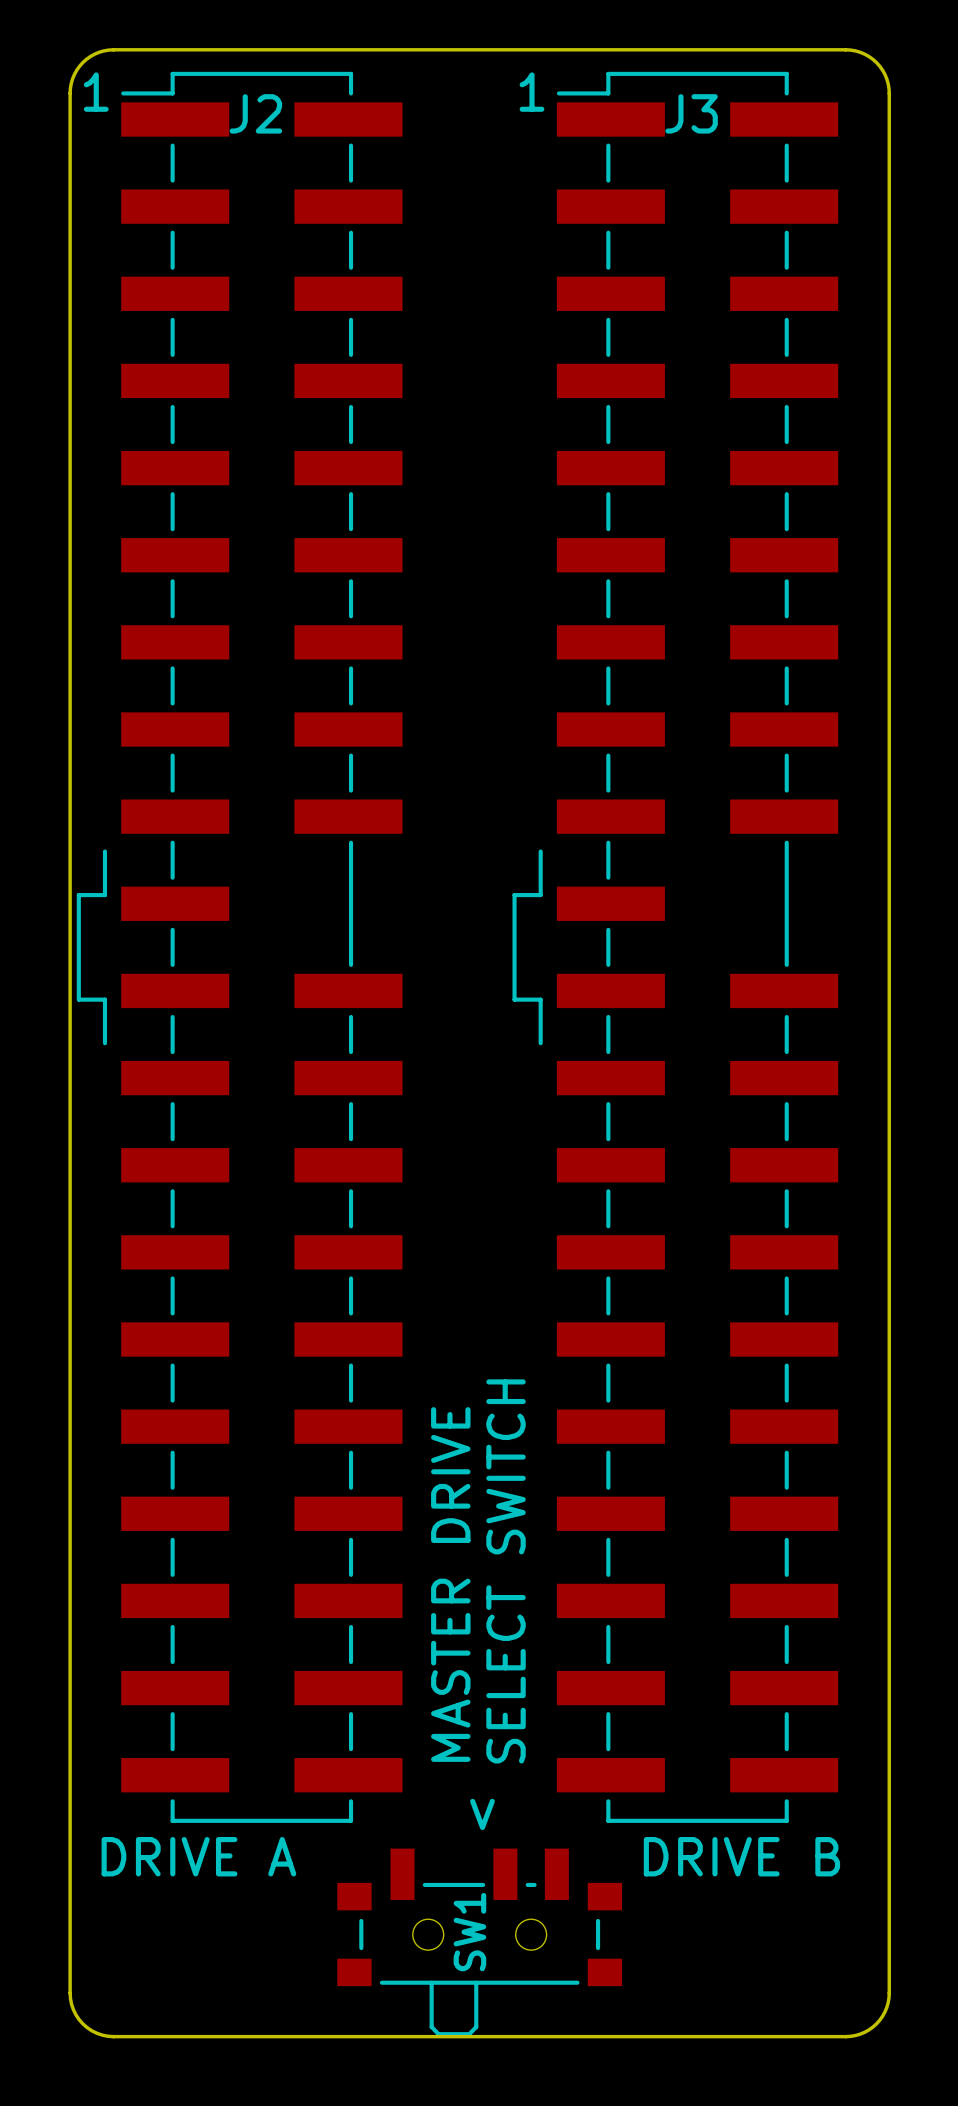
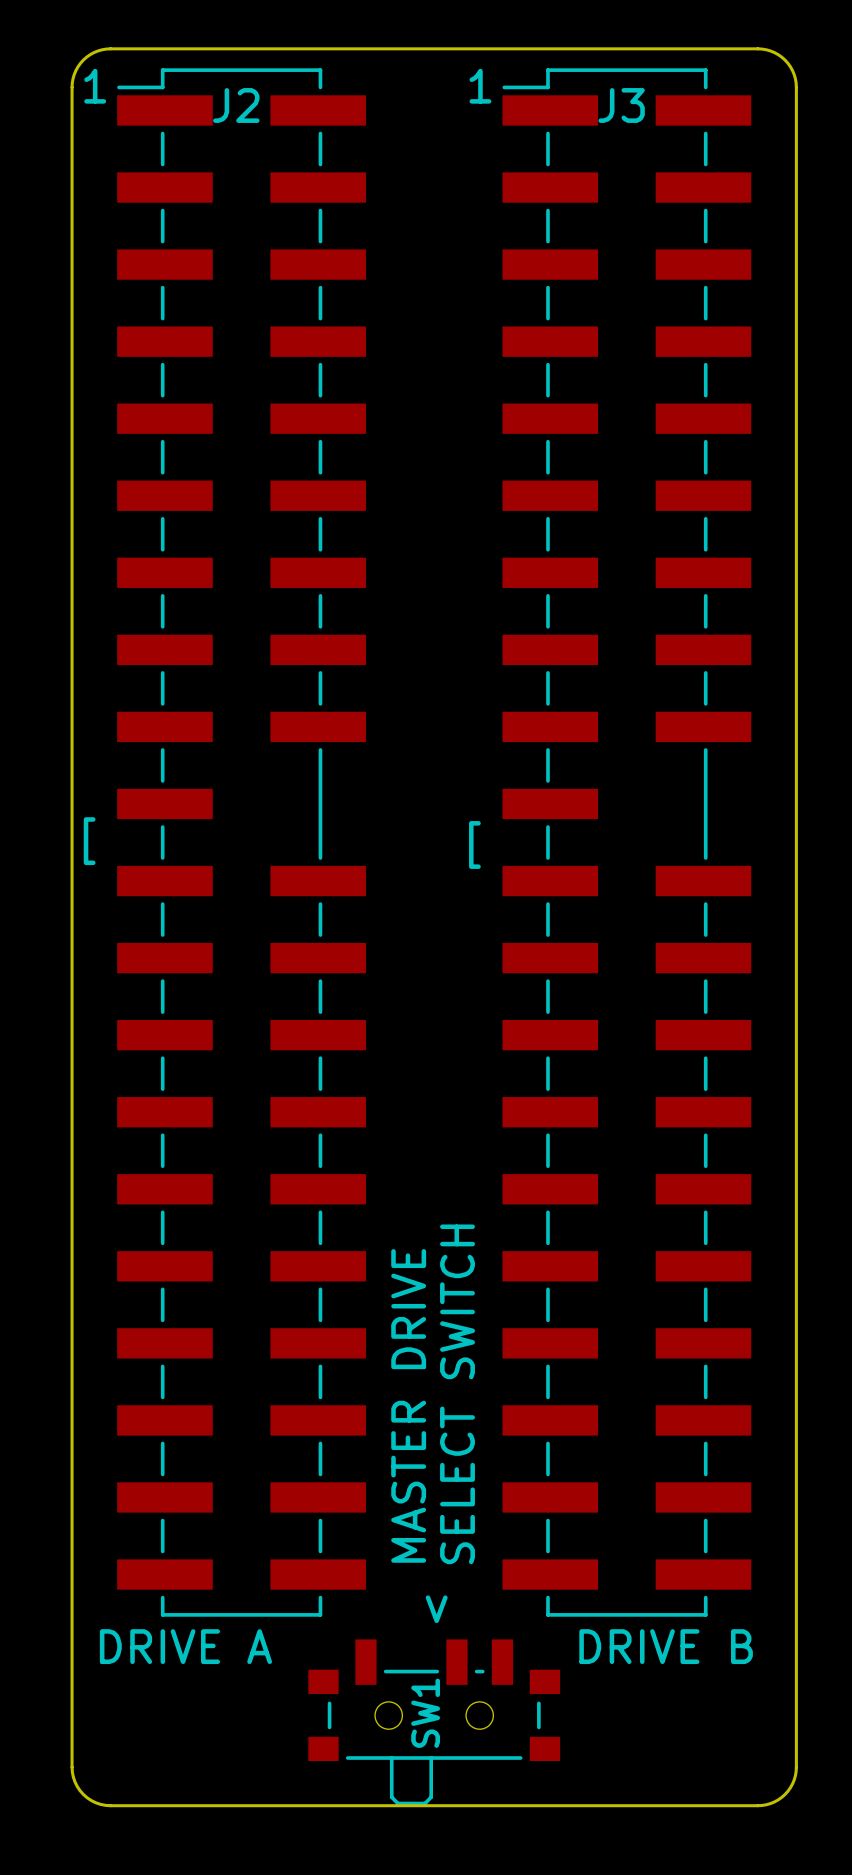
J2 footprint: [76, 71, 403, 1823] -> [117, 68, 366, 1617]
J3 footprint: [512, 71, 839, 1823] -> [502, 68, 752, 1617]
text: none -> [ (89, 841)
text: none -> [ (474, 844)

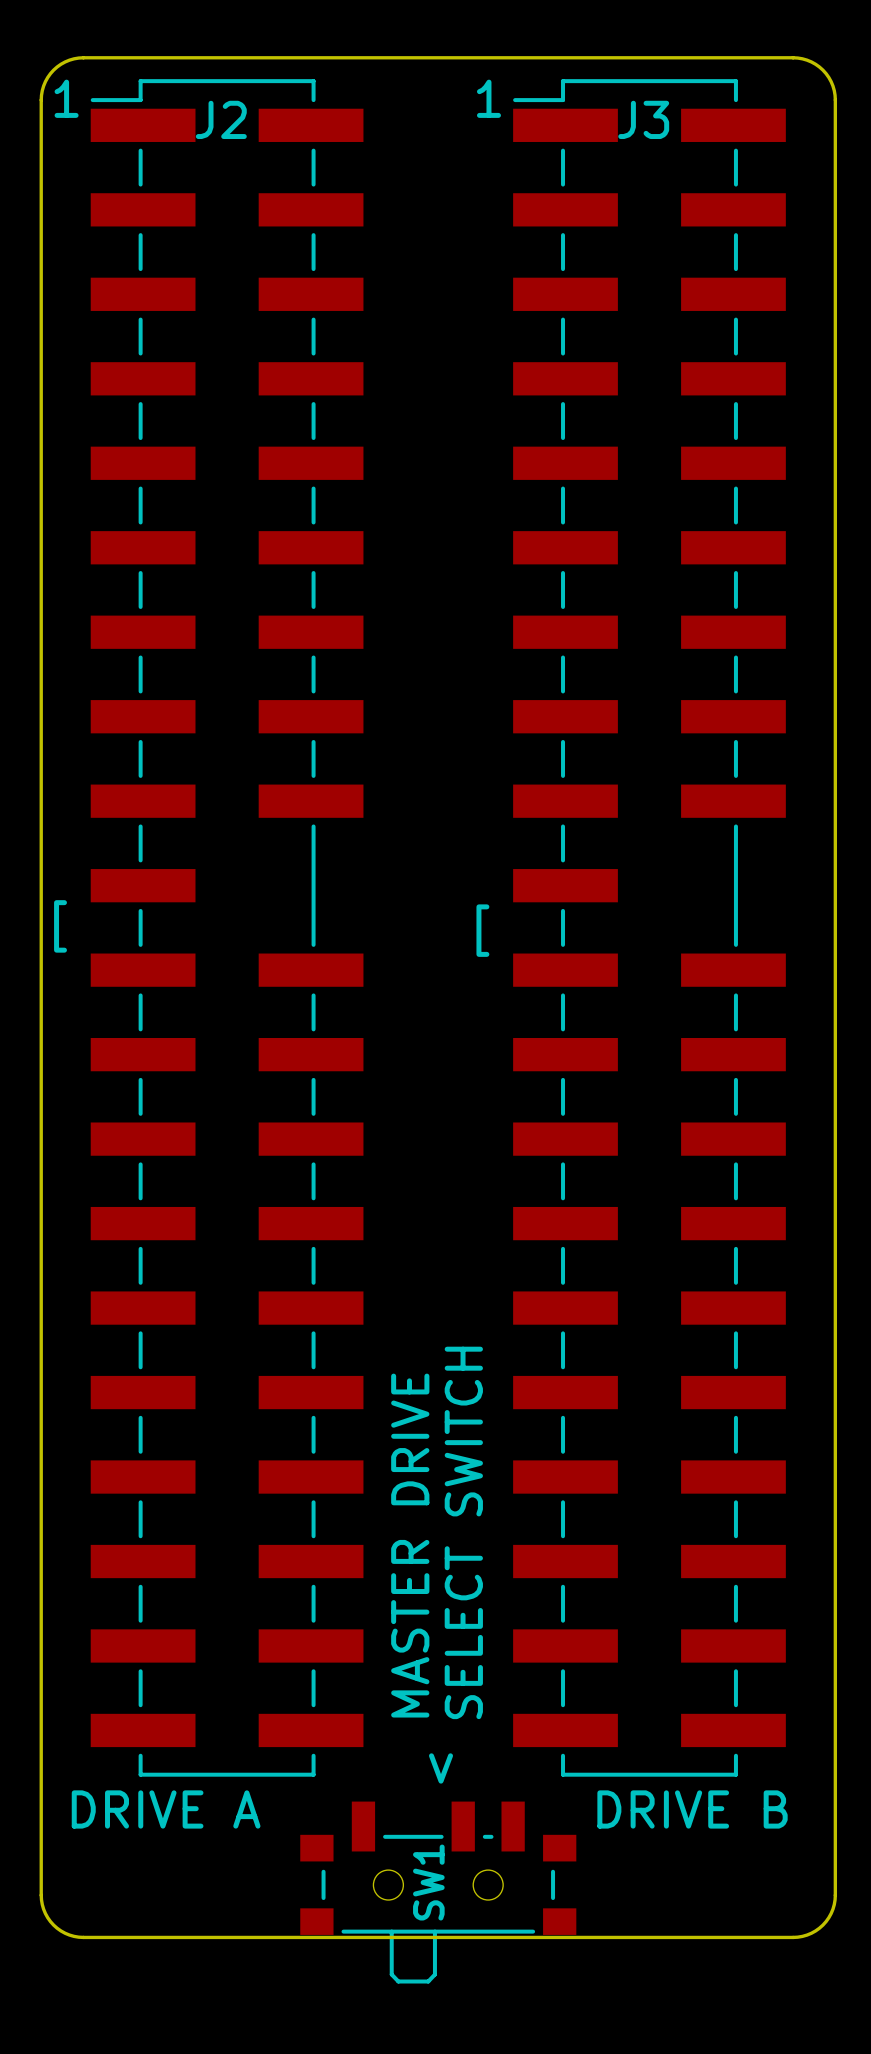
board edge: (72, 1724) (72, 1767) (74, 1781) (87, 1797) (100, 1804) (110, 1805) (762, 1805) (781, 1797) (792, 1783) (796, 1771) (796, 1724) -> (41, 1895) (43, 1909) (53, 1925) (69, 1935) (83, 1937) (797, 1937) (815, 1930) (826, 1921) (832, 1909) (835, 1895)

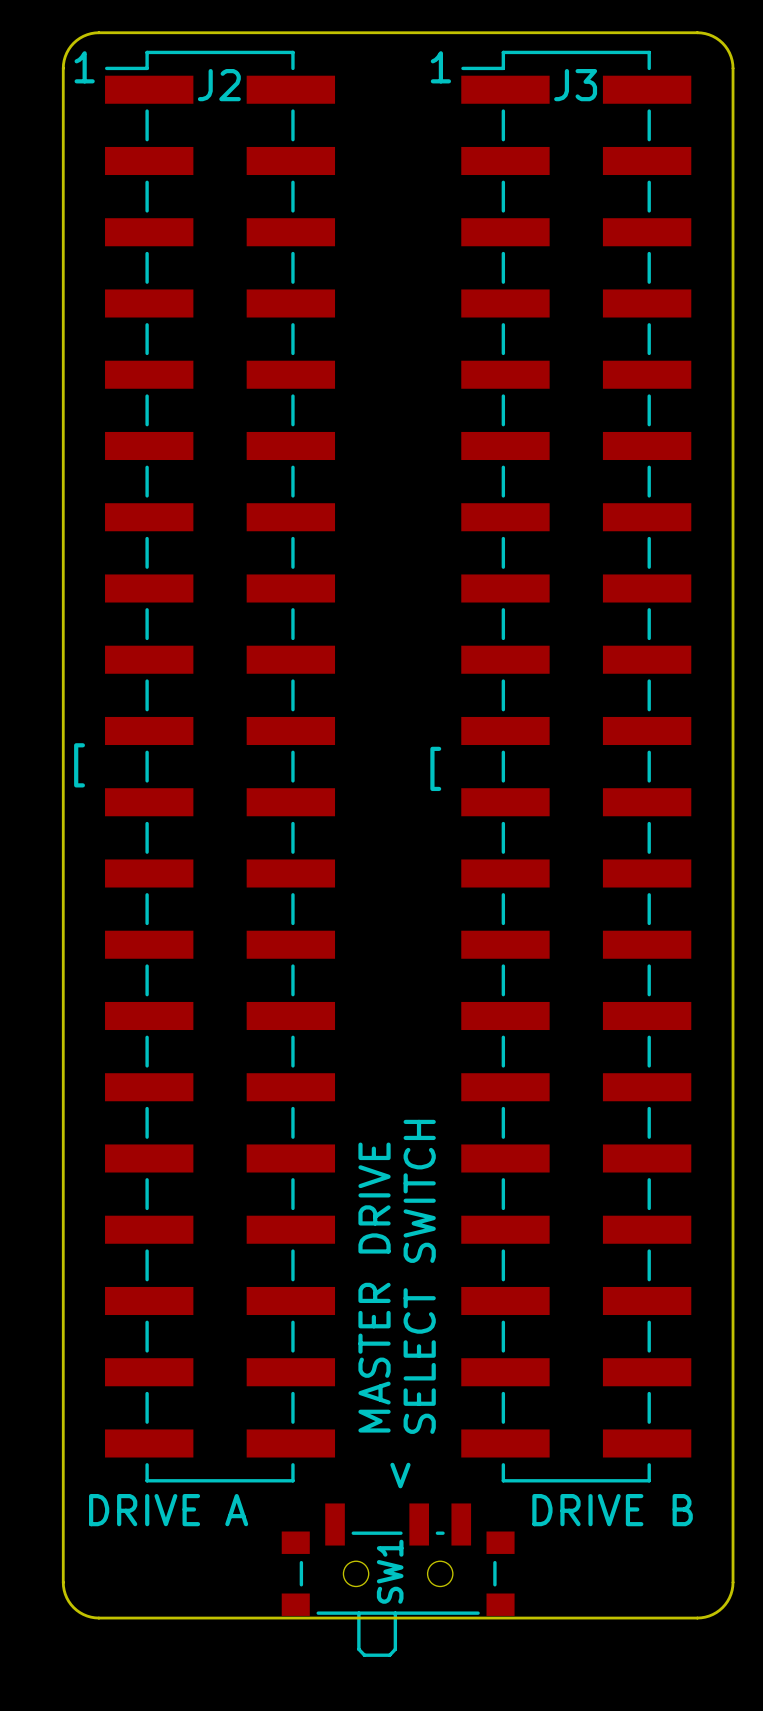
J2 footprint: [90, 79, 364, 1777] -> [105, 50, 336, 1483]
J3 footprint: [513, 79, 786, 1777] -> [461, 50, 692, 1483]

